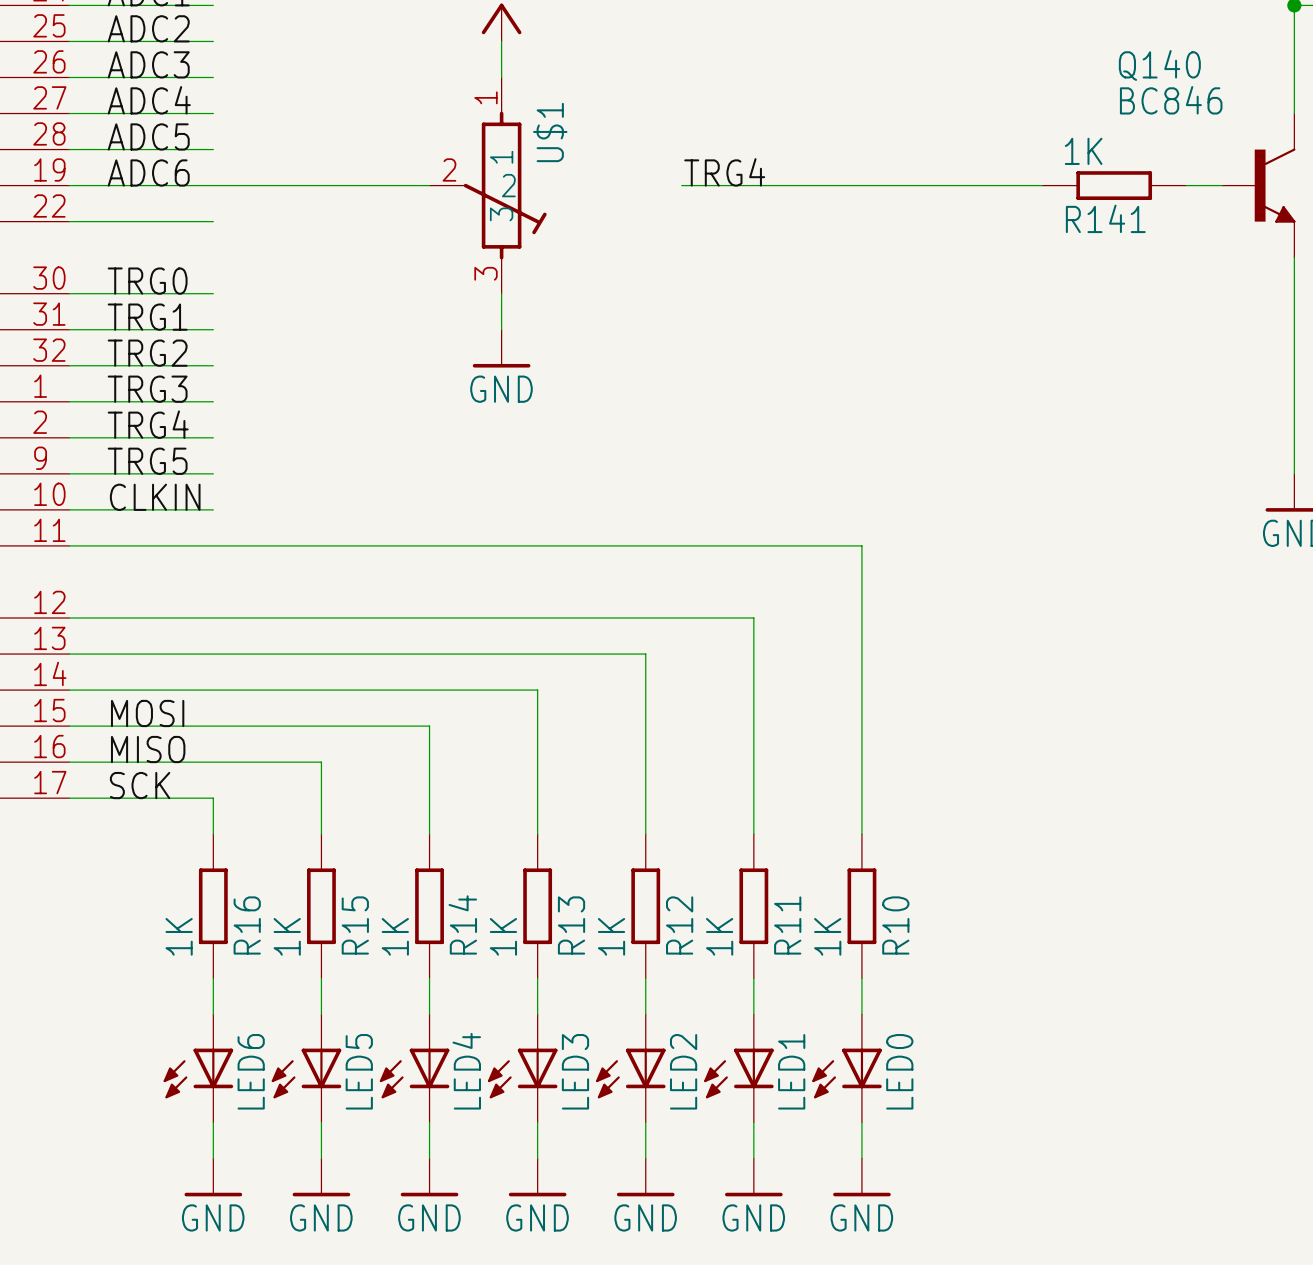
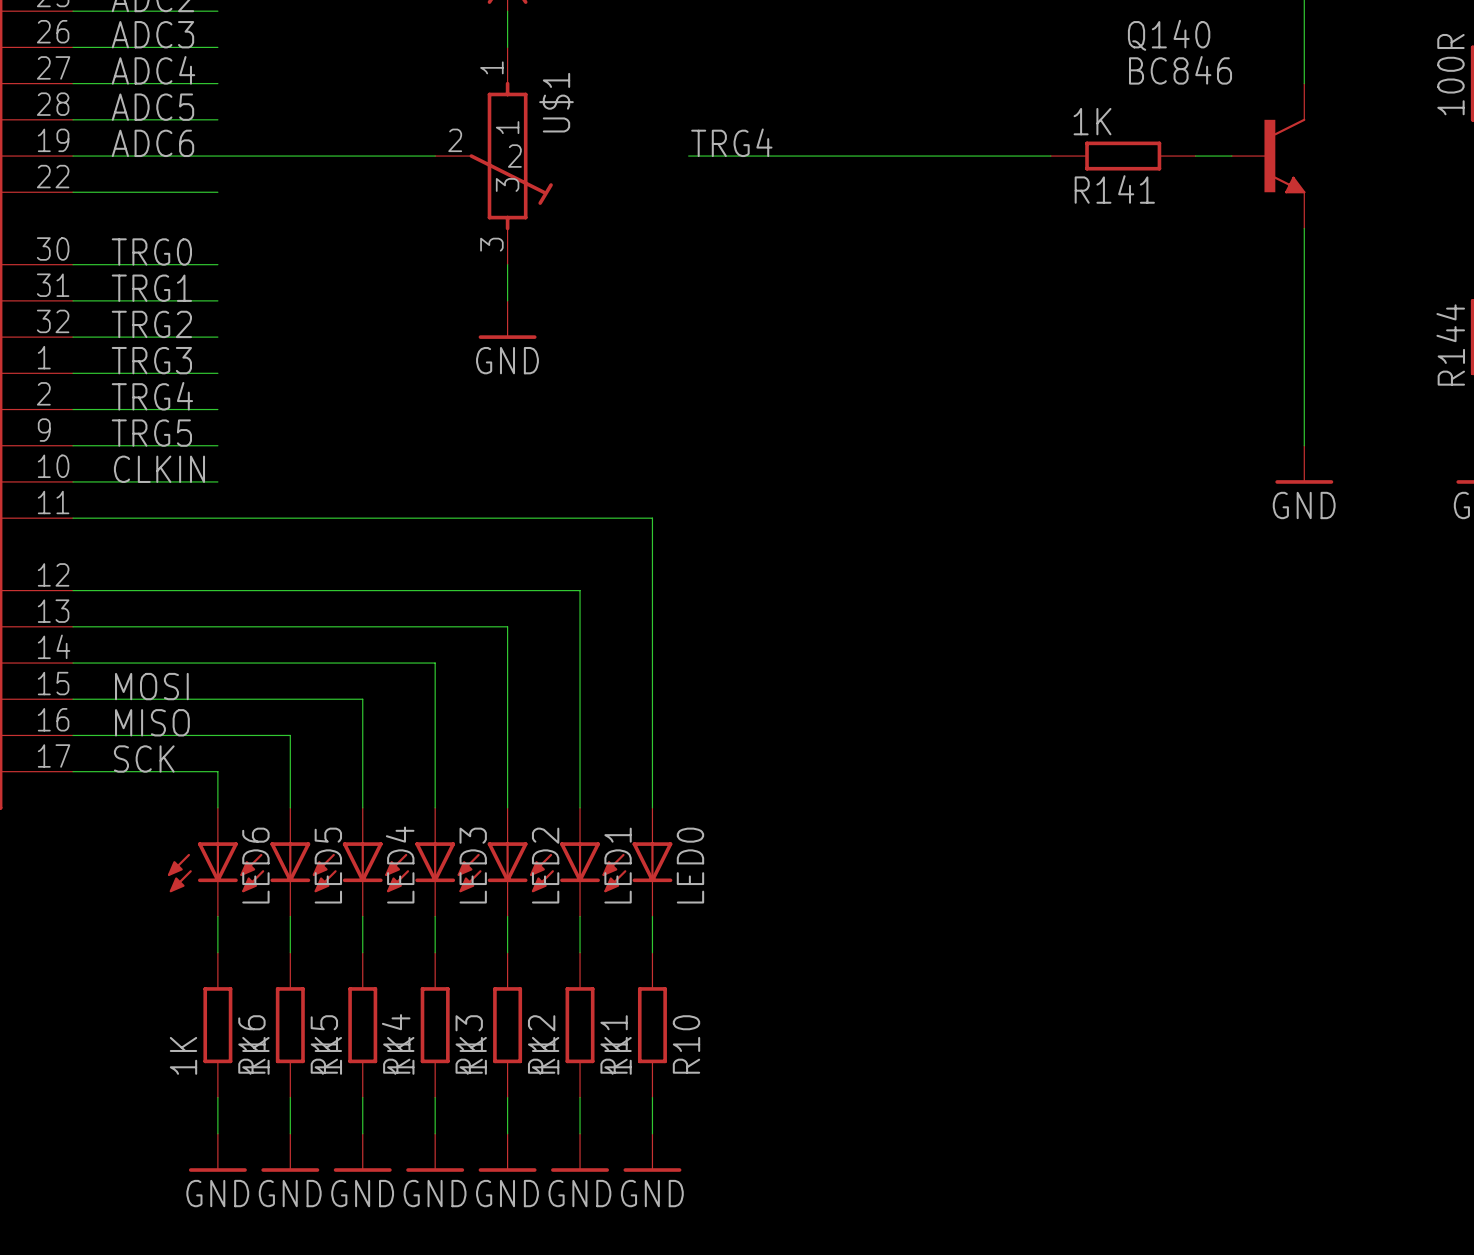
wire: (645, 545) (861, 545) (861, 834) -> none
wire: (573, 618) (753, 618) (753, 834) -> (580, 590) (580, 807)
wire: (501, 654) (645, 654) -> (652, 518) (652, 626)
wire: none -> (507, 626) (507, 807)
wire: (429, 690) (537, 690) (537, 834) -> none
wire: (357, 726) (429, 726) -> (435, 663) (435, 699)
wire: none -> (362, 699) (362, 807)
wire: (285, 762) (321, 762) (321, 834) -> (290, 735) (290, 807)
R16 position: (213, 906) -> (217, 1025)
R15 position: (321, 906) -> (290, 1025)
R14 position: (429, 906) -> (362, 1025)
R13 position: (537, 906) -> (435, 1025)
R12 position: (645, 906) -> (507, 1025)
R11 position: (753, 906) -> (580, 1025)
R10 position: (861, 906) -> (652, 1025)
wire: none -> (362, 916) (362, 952)
wire: (321, 978) (321, 1014) -> (290, 916) (290, 952)
wire: (537, 978) (537, 1014) -> (507, 916) (507, 952)
wire: (753, 978) (753, 1014) -> (580, 916) (580, 952)
wire: (861, 978) (861, 1014) -> none
LED6 position: (198, 1068) -> (202, 862)
LED5 position: (306, 1068) -> (275, 862)
LED4 position: (414, 1068) -> (347, 862)
LED3 position: (522, 1068) -> (420, 862)
LED2 position: (630, 1068) -> (492, 862)
LED1 position: (738, 1068) -> (564, 862)
LED0 position: (846, 1068) -> (637, 862)
wire: (321, 1122) (321, 1158) -> (290, 1097) (290, 1133)
wire: none -> (362, 1097) (362, 1133)
wire: (537, 1122) (537, 1158) -> (507, 1097) (507, 1133)
wire: (753, 1122) (753, 1158) -> (580, 1097) (580, 1133)
wire: (861, 1122) (861, 1158) -> none
power symbol: none -> GND (290, 1152)
power symbol: GND (321, 1177) -> none
power symbol: none -> GND (362, 1152)
power symbol: none -> GND (507, 1152)
power symbol: GND (537, 1177) -> none
power symbol: none -> GND (580, 1152)
power symbol: GND (753, 1177) -> none
power symbol: GND (861, 1177) -> none

